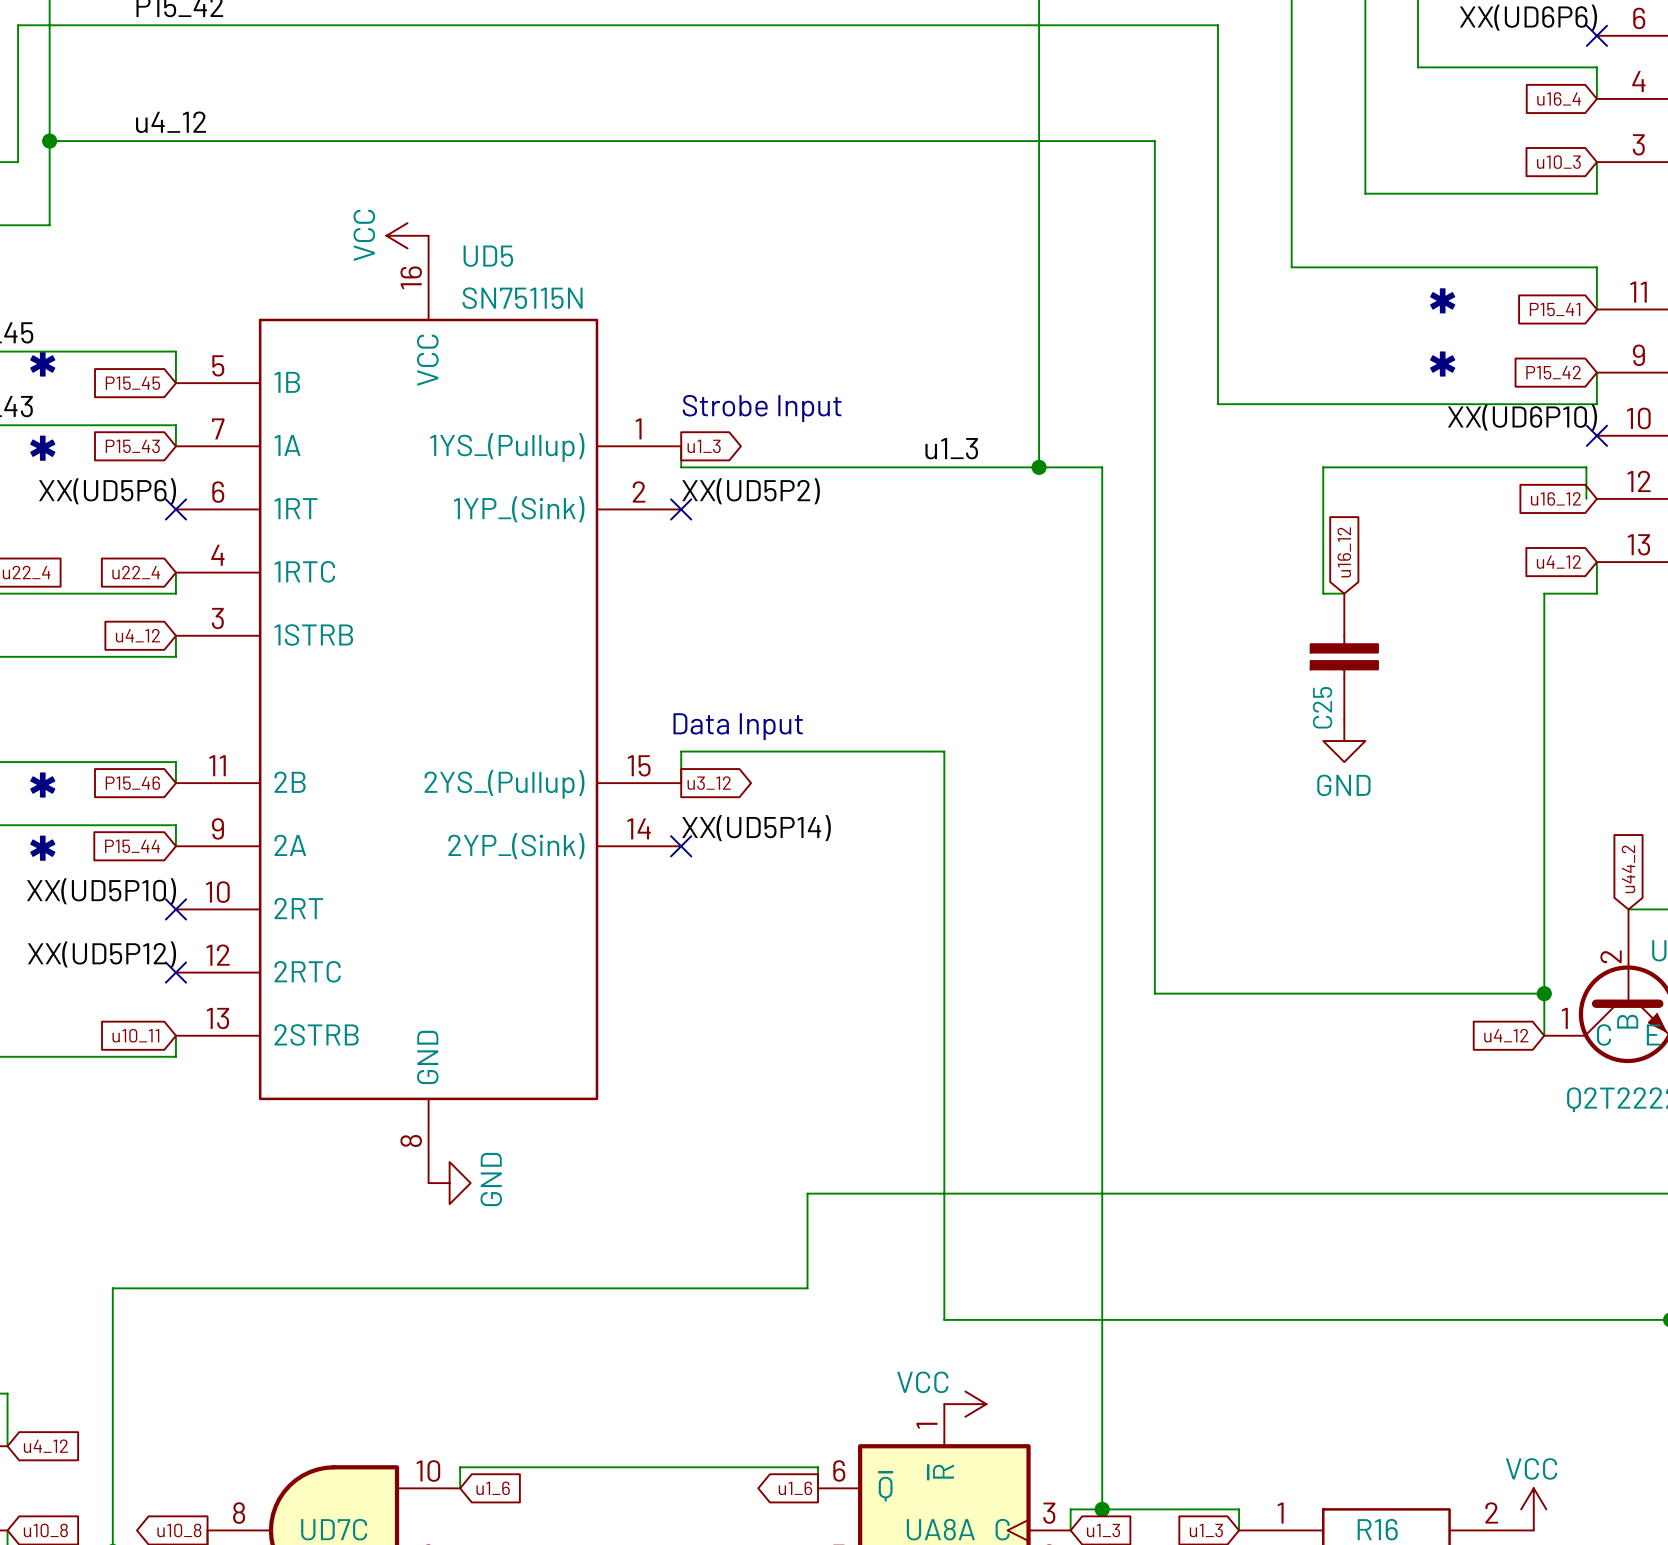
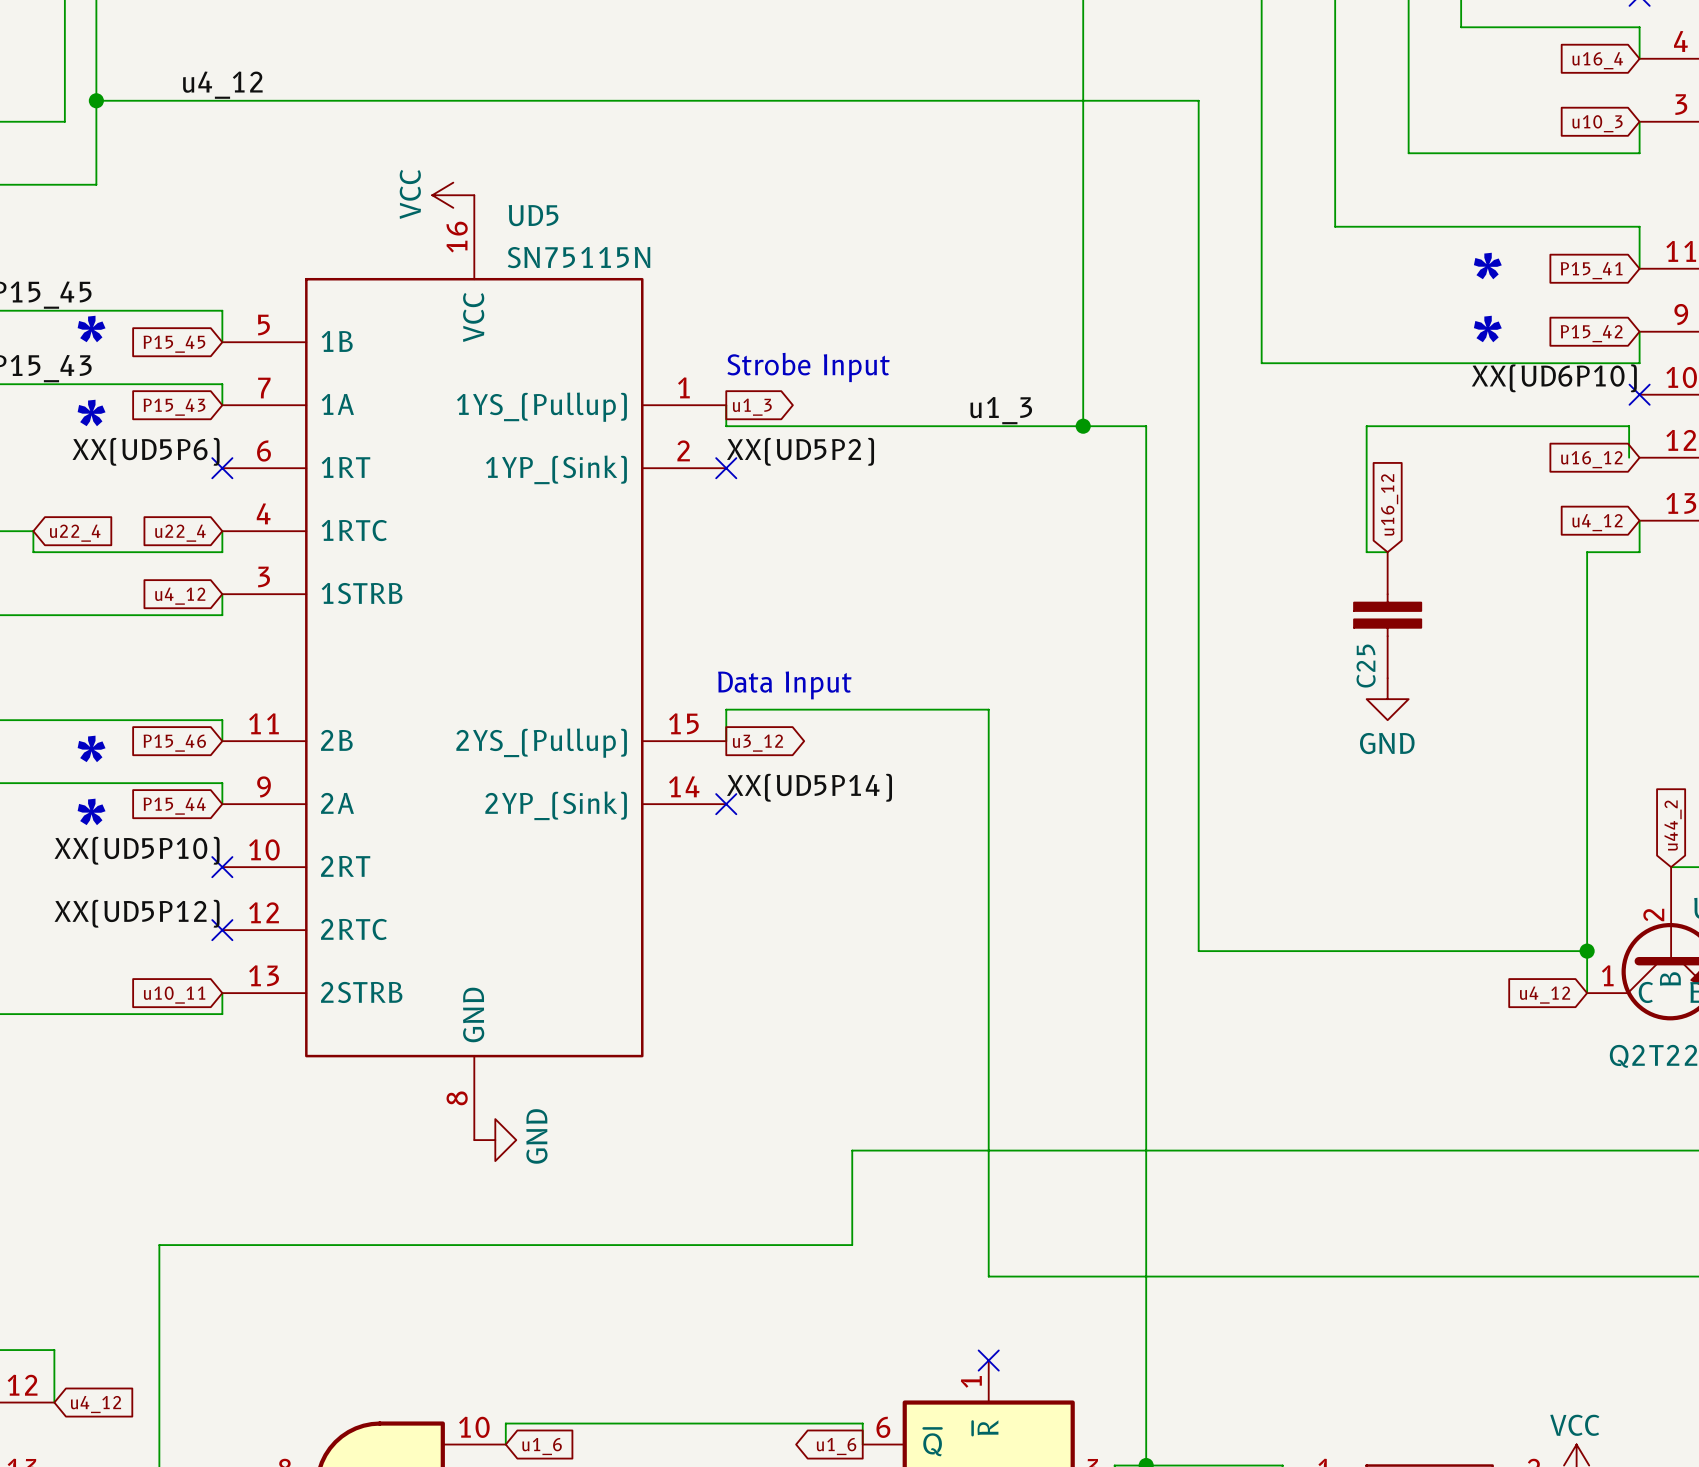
no-connect mark: none -> (988, 1360)
power symbol: VCC (965, 1404) -> none

